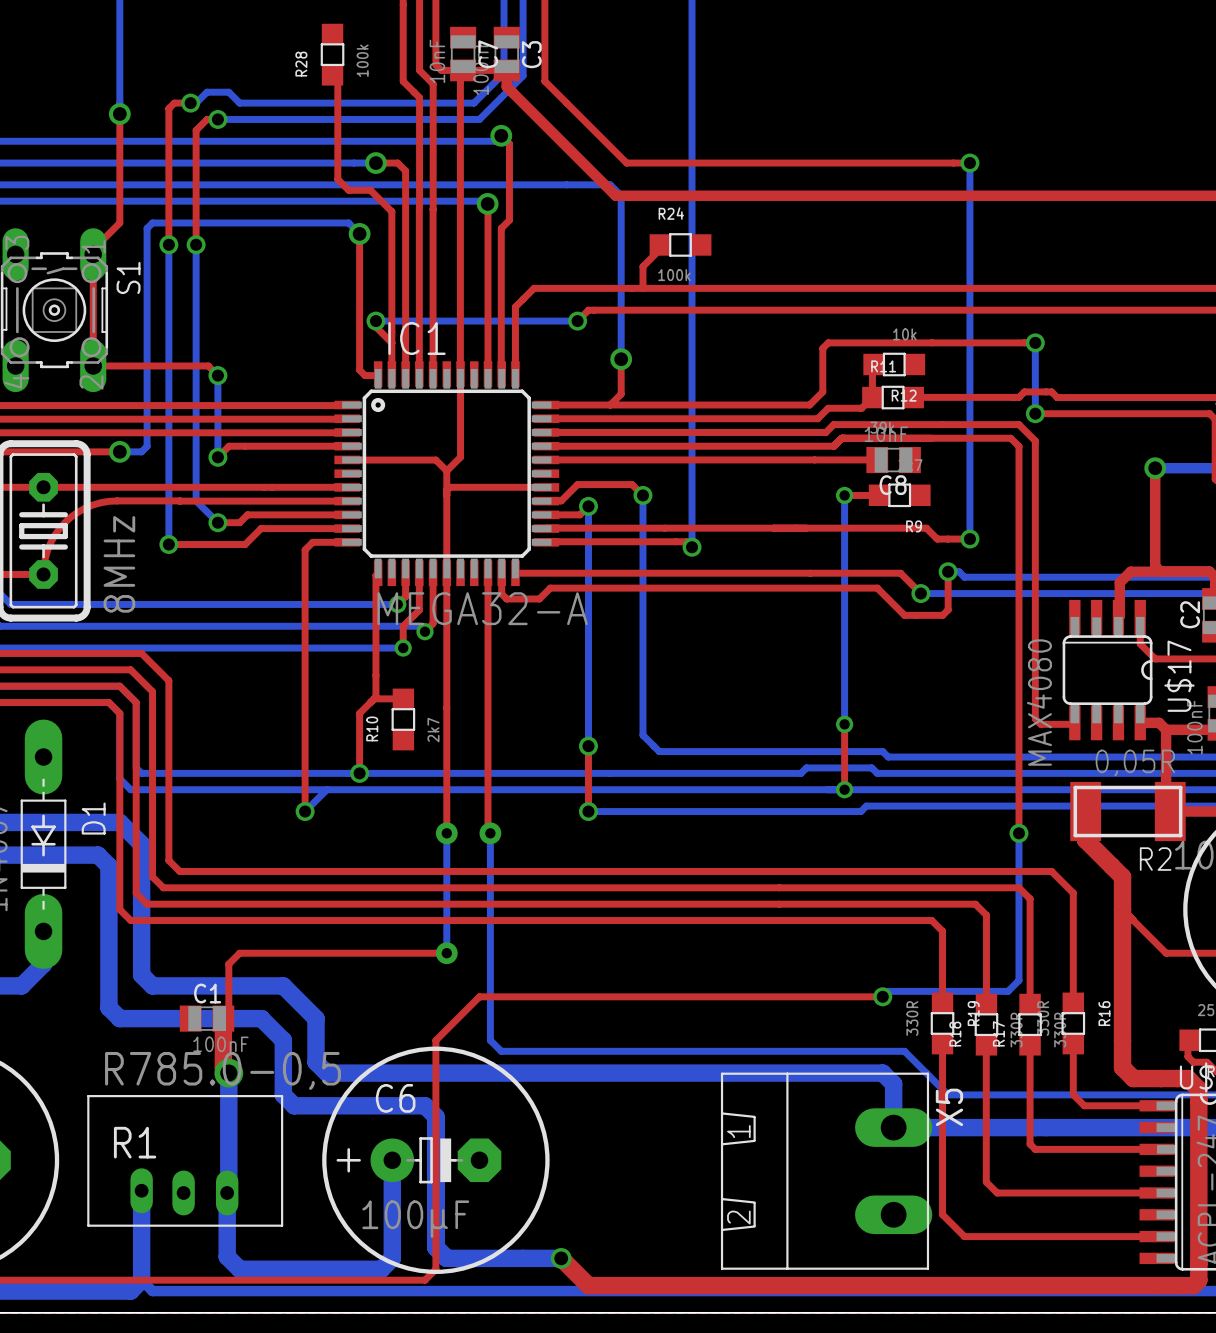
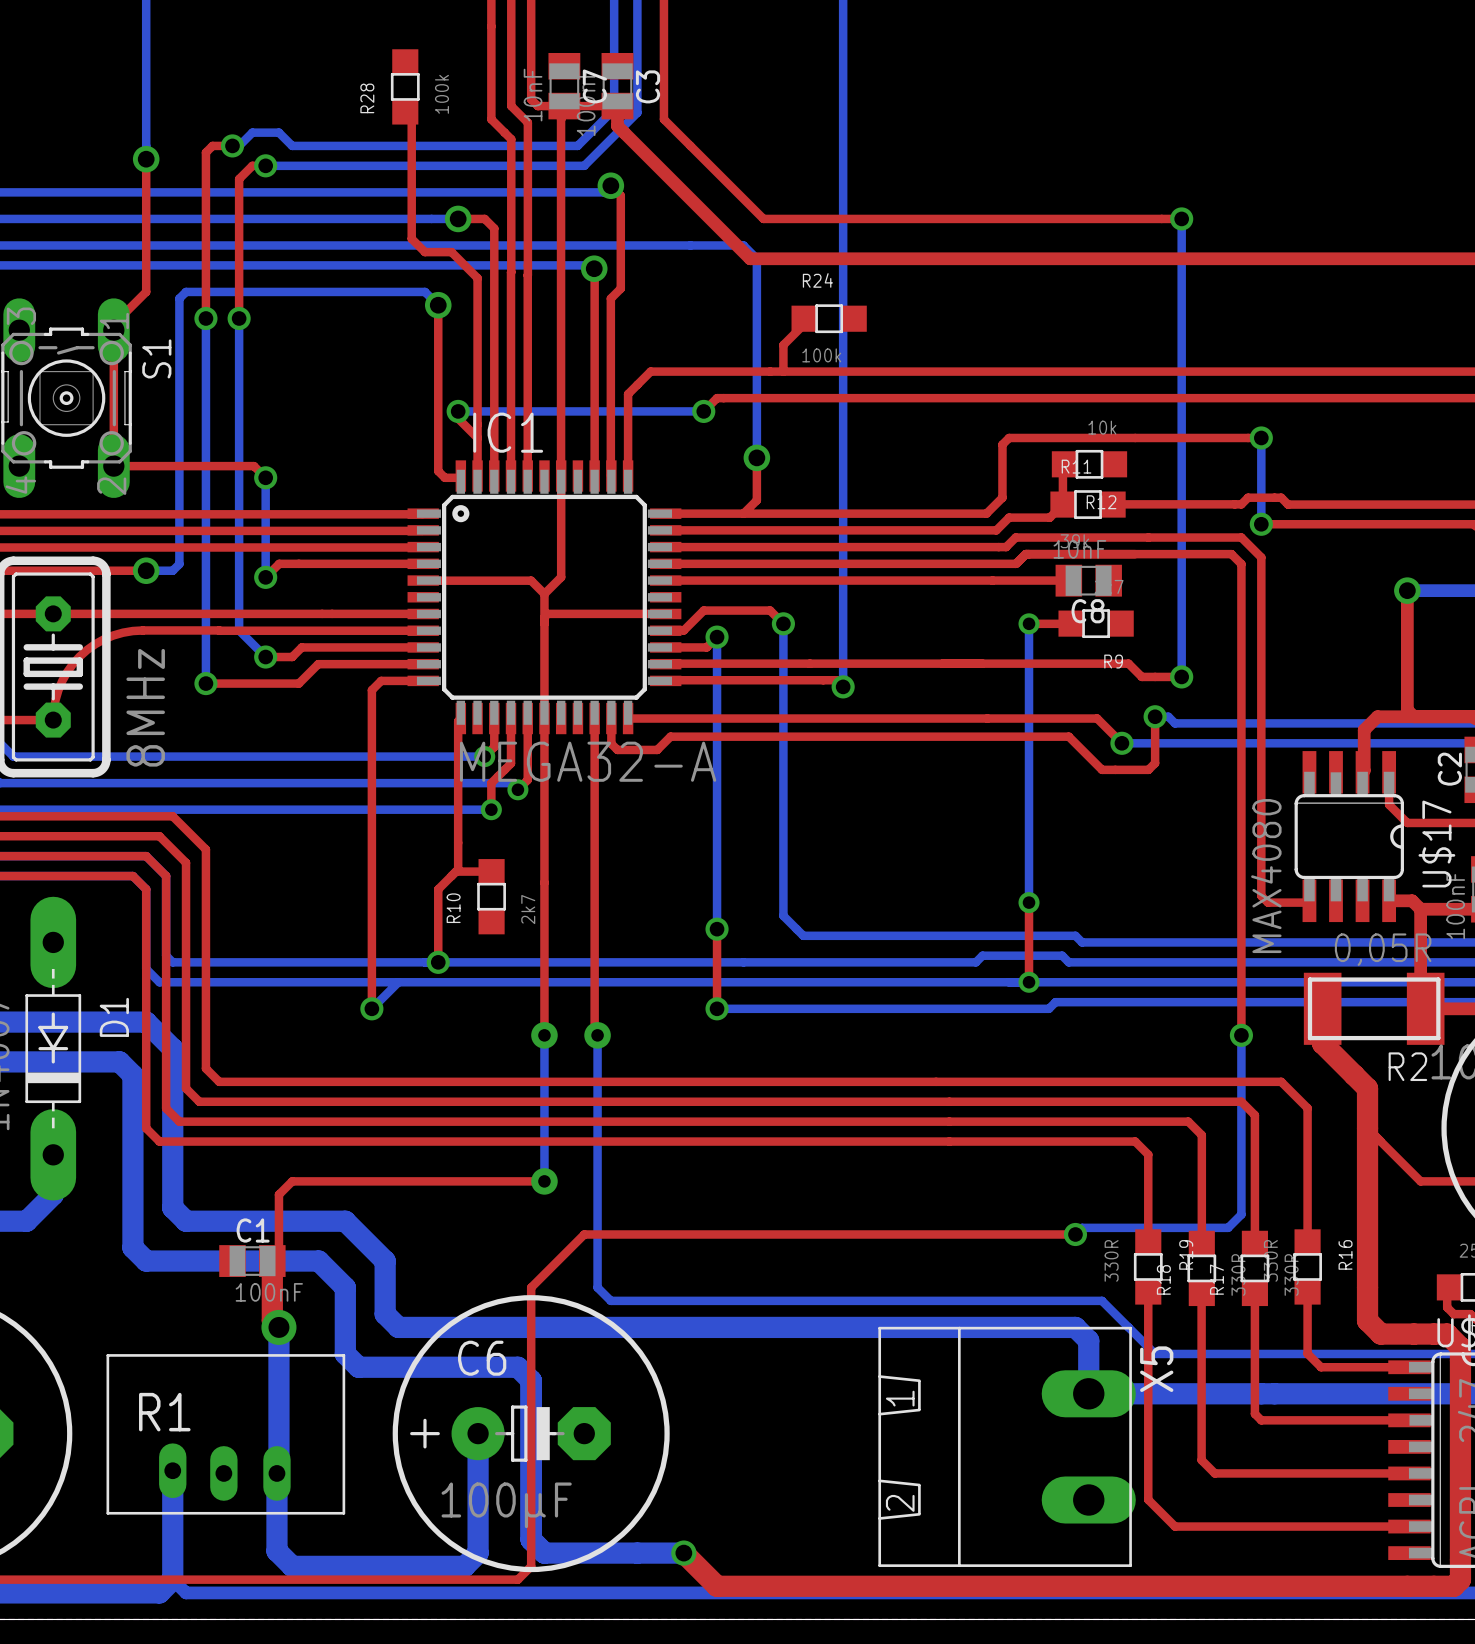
R1 value: R785.0-0,5 (222, 1070) -> none

